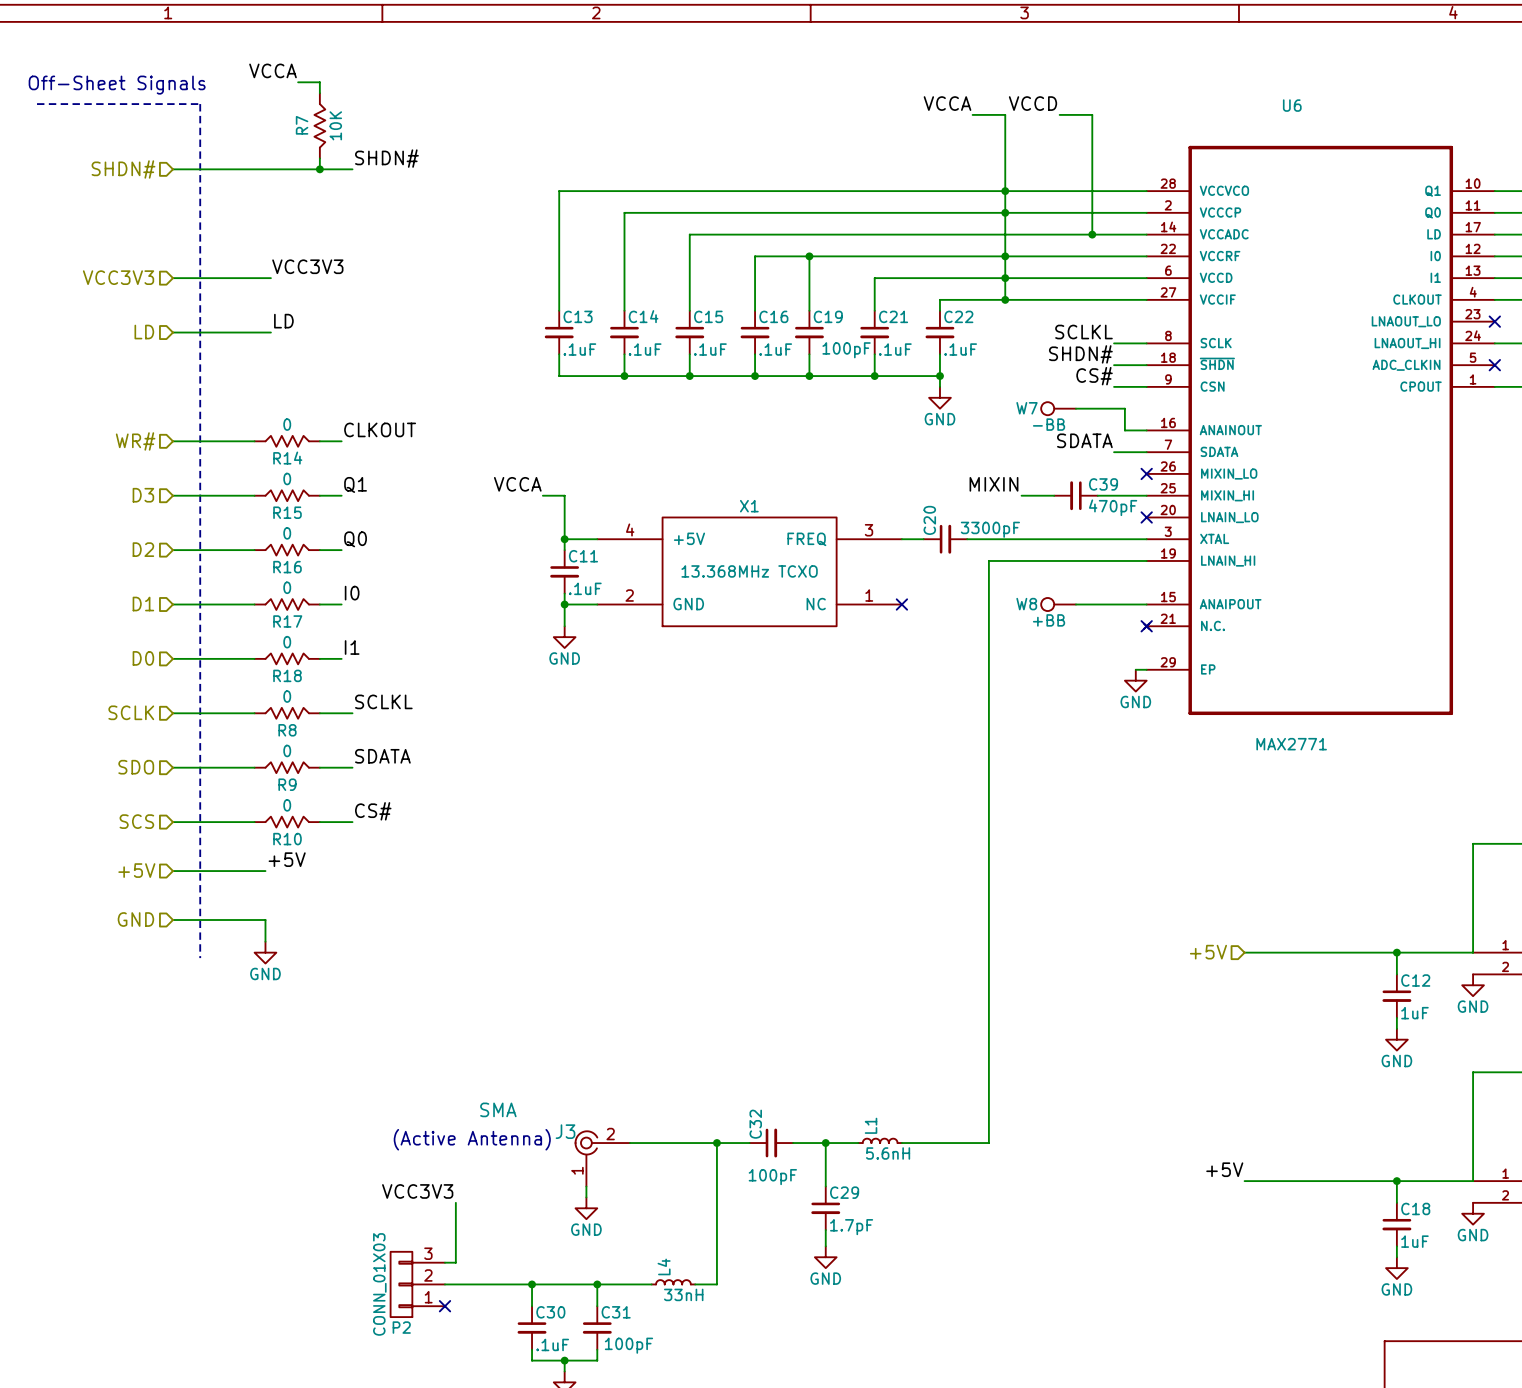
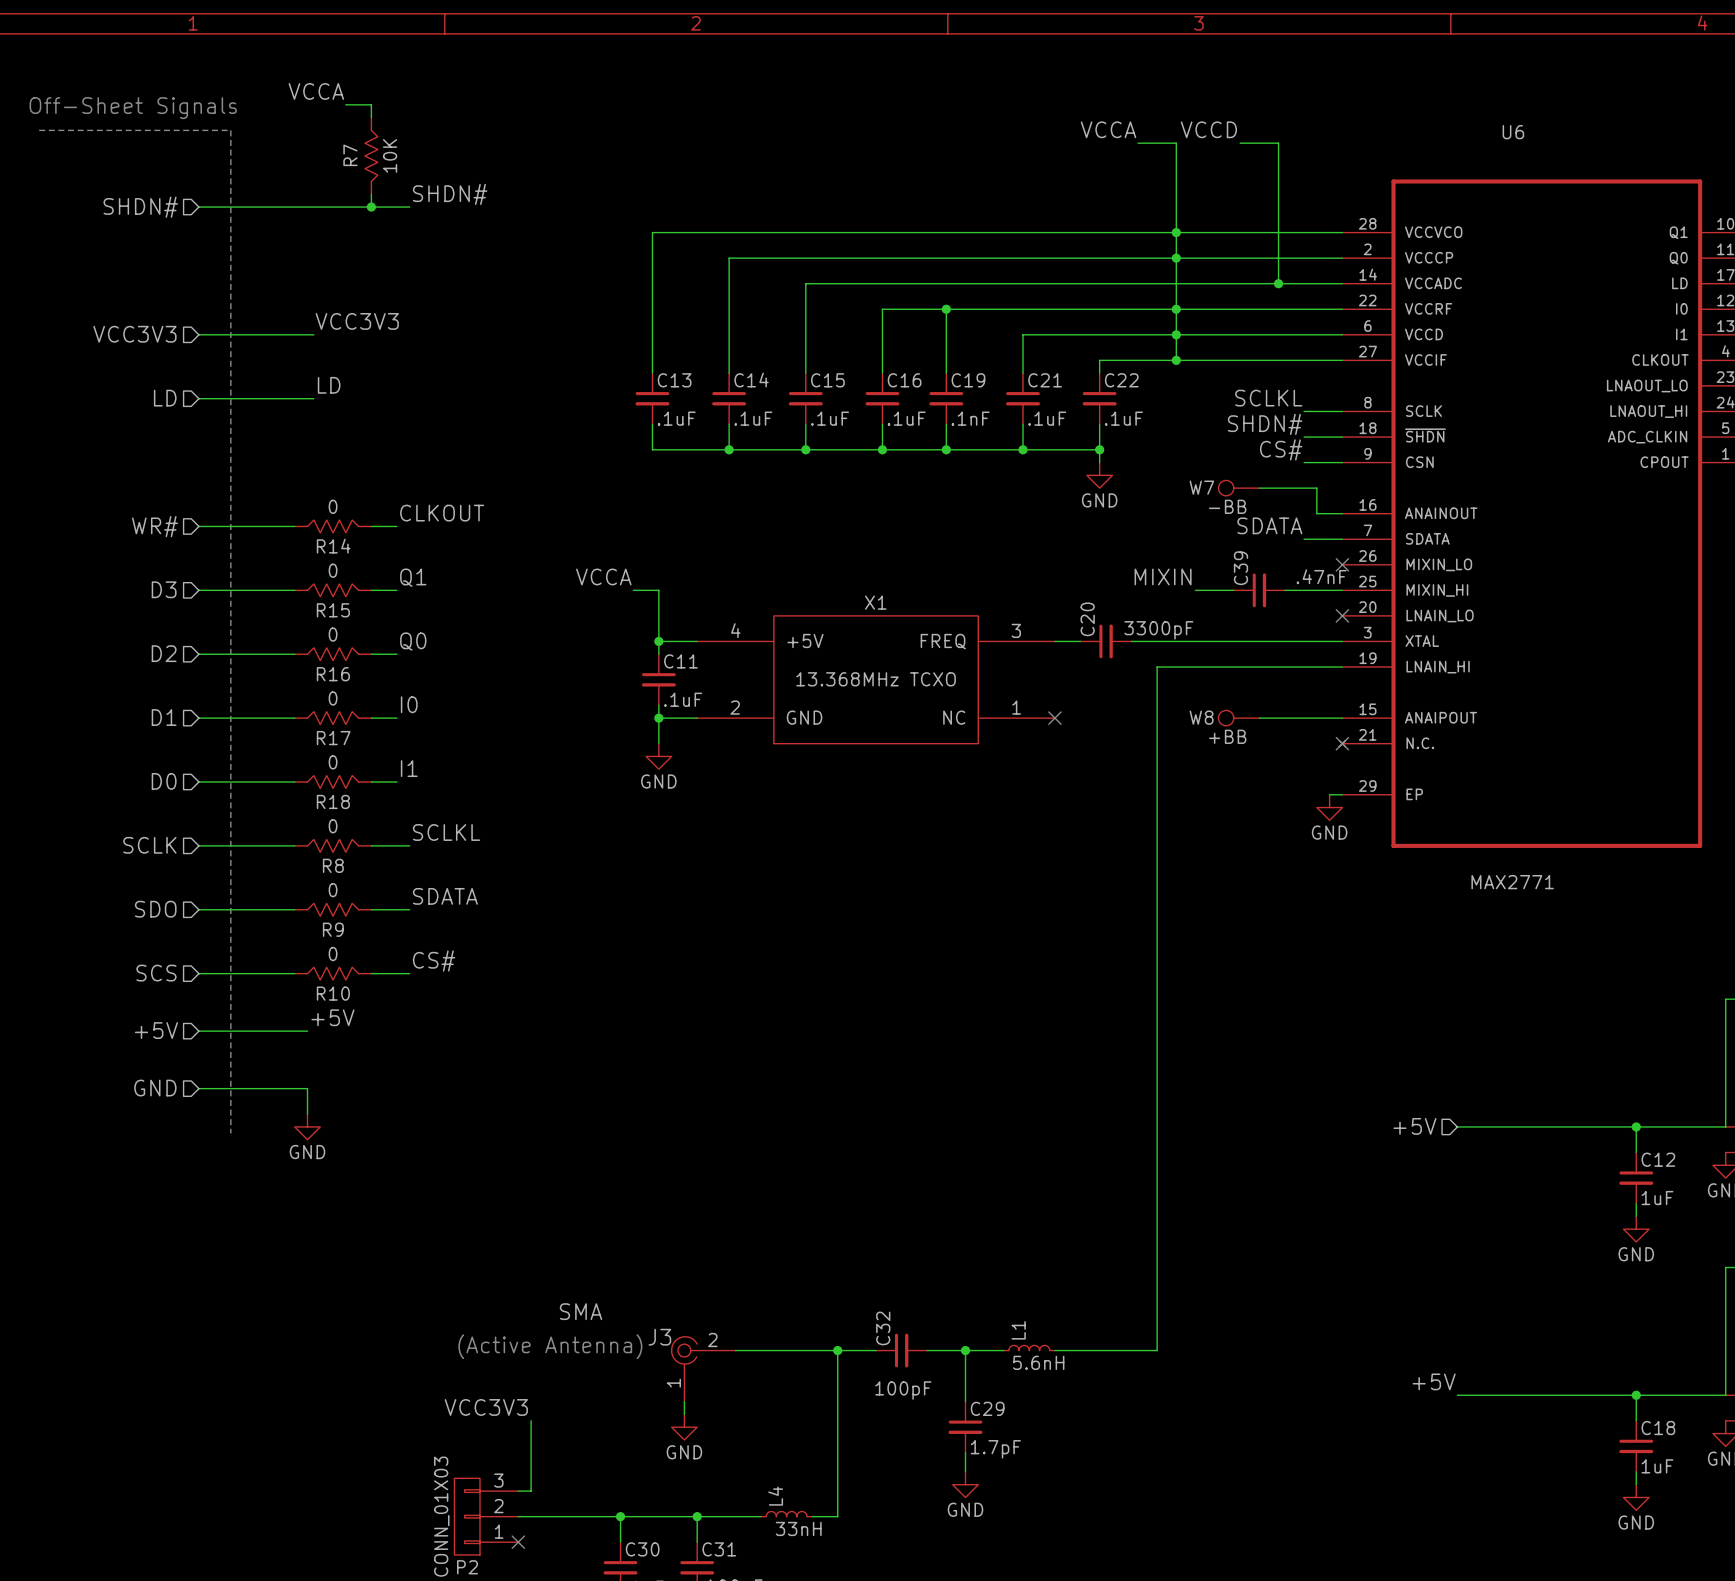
C19 value: 100pF (846, 350) -> .1nF (970, 418)
C39 name position: C39 (1103, 484) -> C39 (1240, 568)
C39 rotation: 0° (1075, 495) -> 180° (1259, 590)
C39 value: 470pF (1113, 507) -> .47nF (1321, 576)

